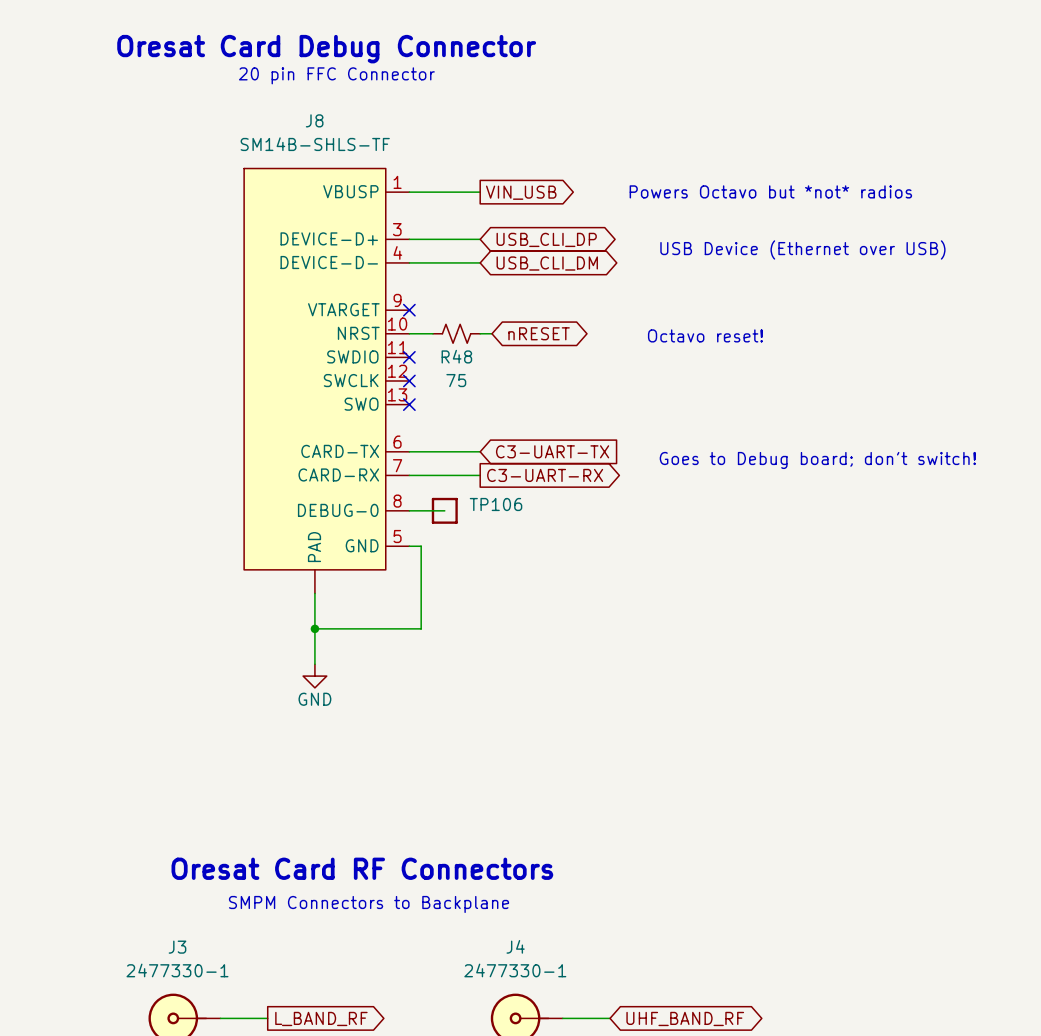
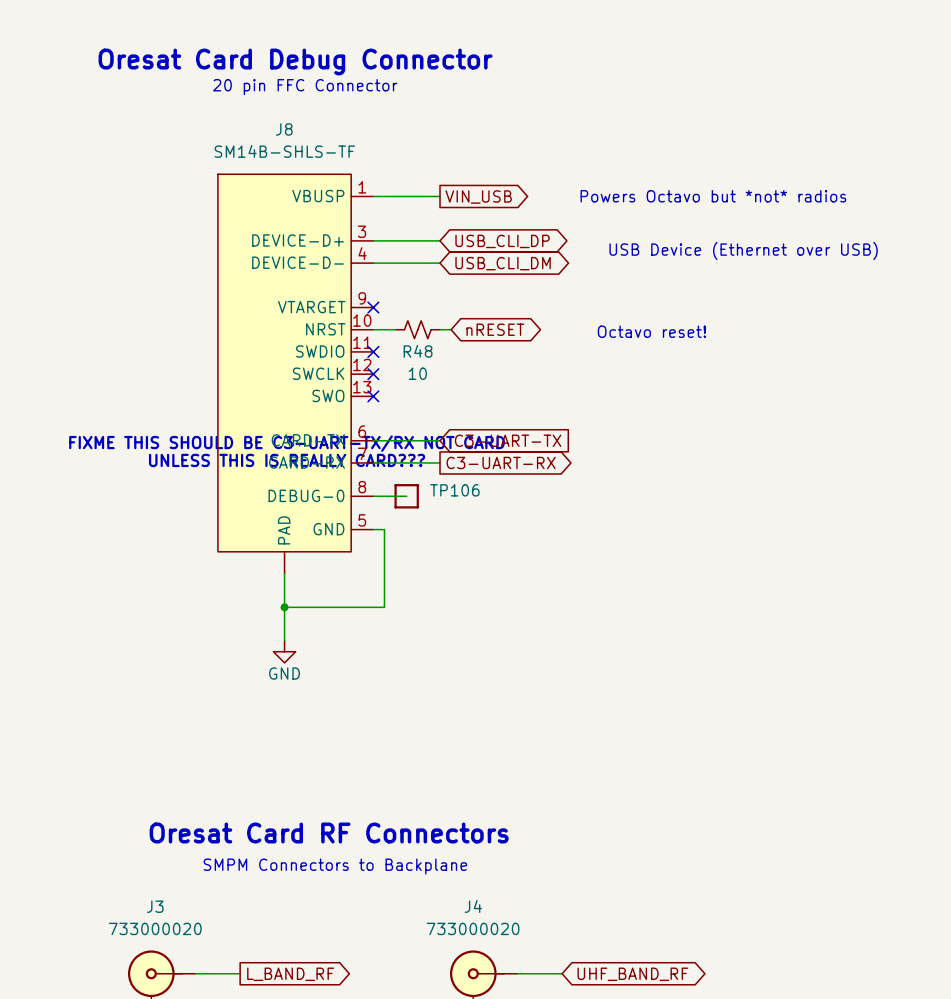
R48 value: 75 (456, 380) -> 10 (417, 373)
text: none -> FIXME THIS SHOULD BE C3-UART-TX/RX NOT CARD (287, 443)
text: Goes to Debug board; don't switch! (817, 460) -> none
text: none -> UNLESS THIS IS REALLY CARD??? (287, 460)
J3 value: 2477330-1 (177, 970) -> 733000020 (155, 928)
J4 value: 2477330-1 (515, 970) -> 733000020 (473, 928)

